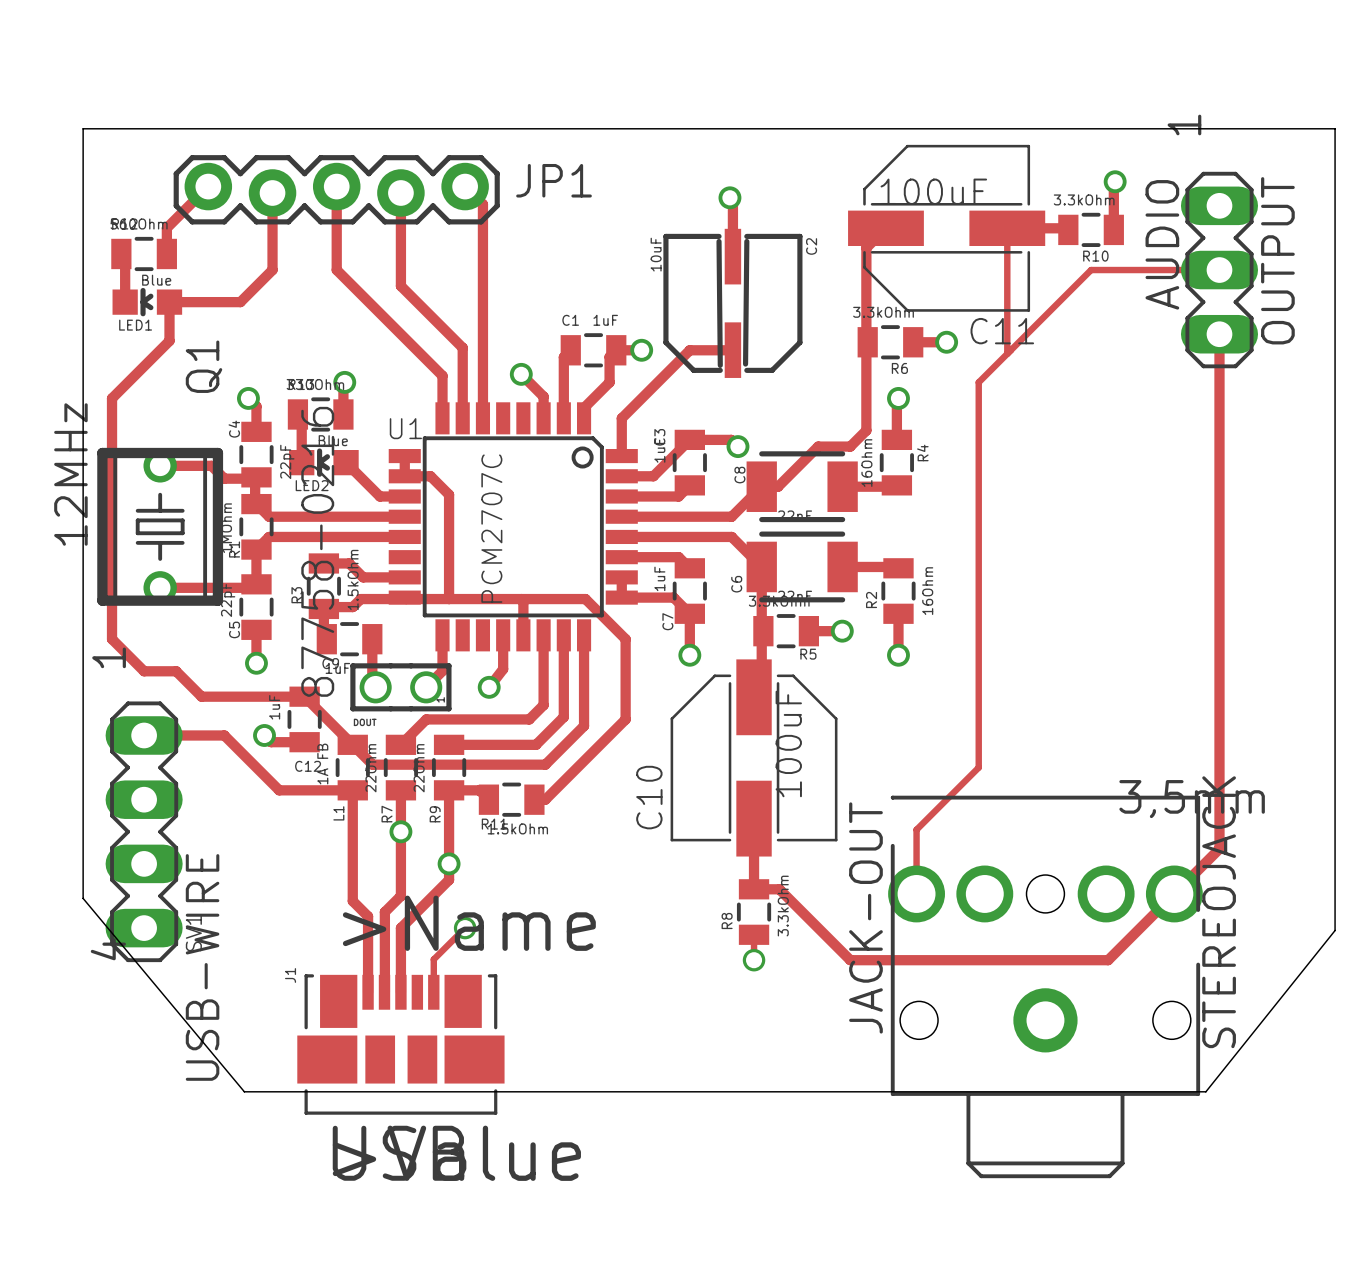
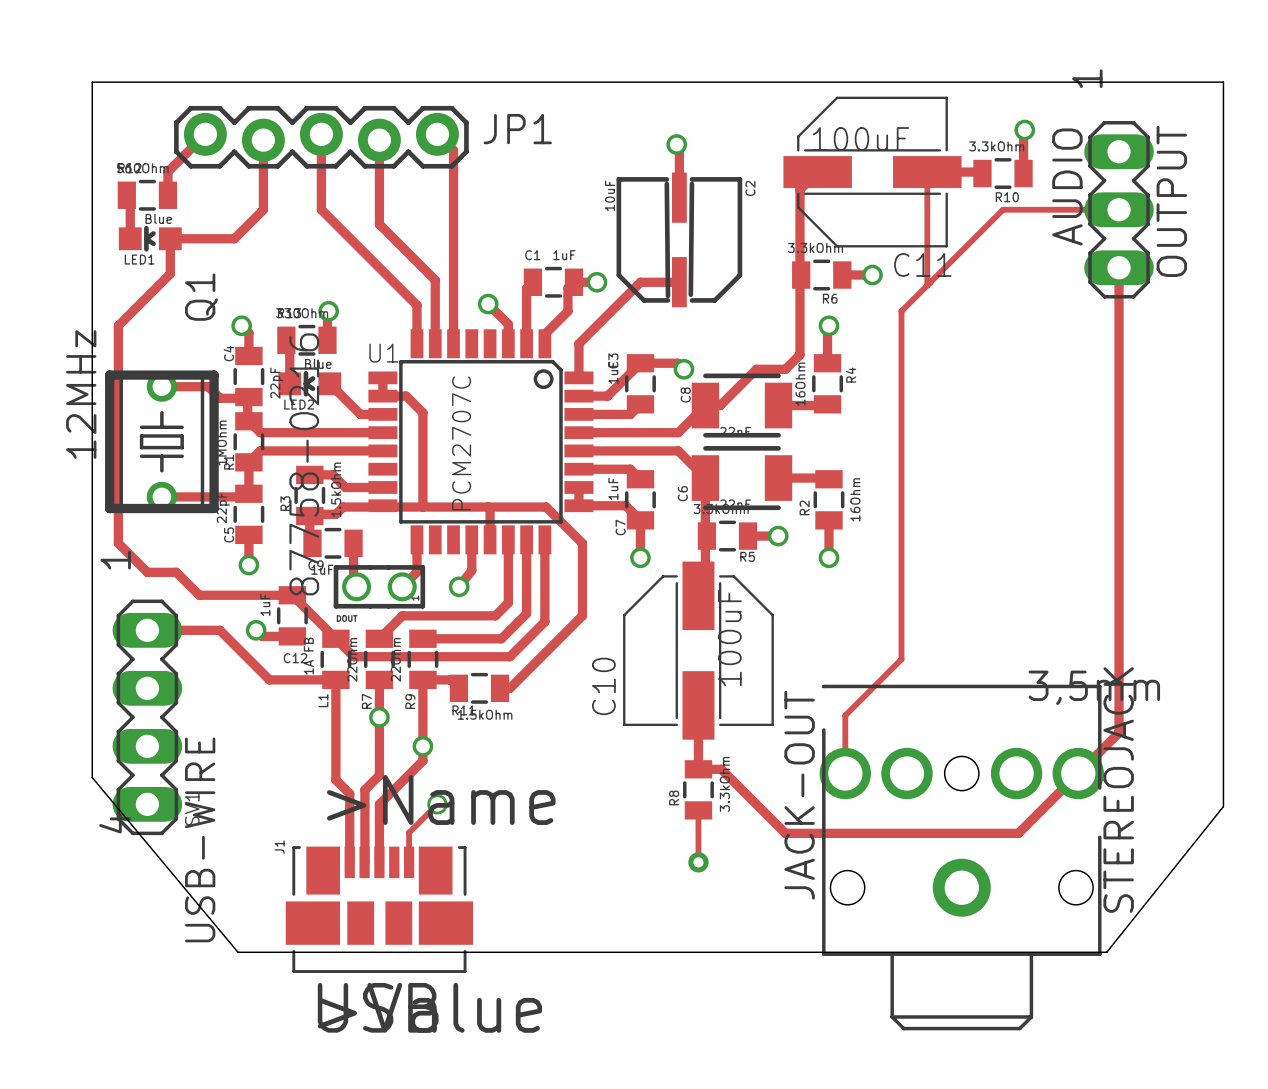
track: none -> (698, 833) (698, 862)
via: (754, 960) -> none
via: none -> (698, 862)

